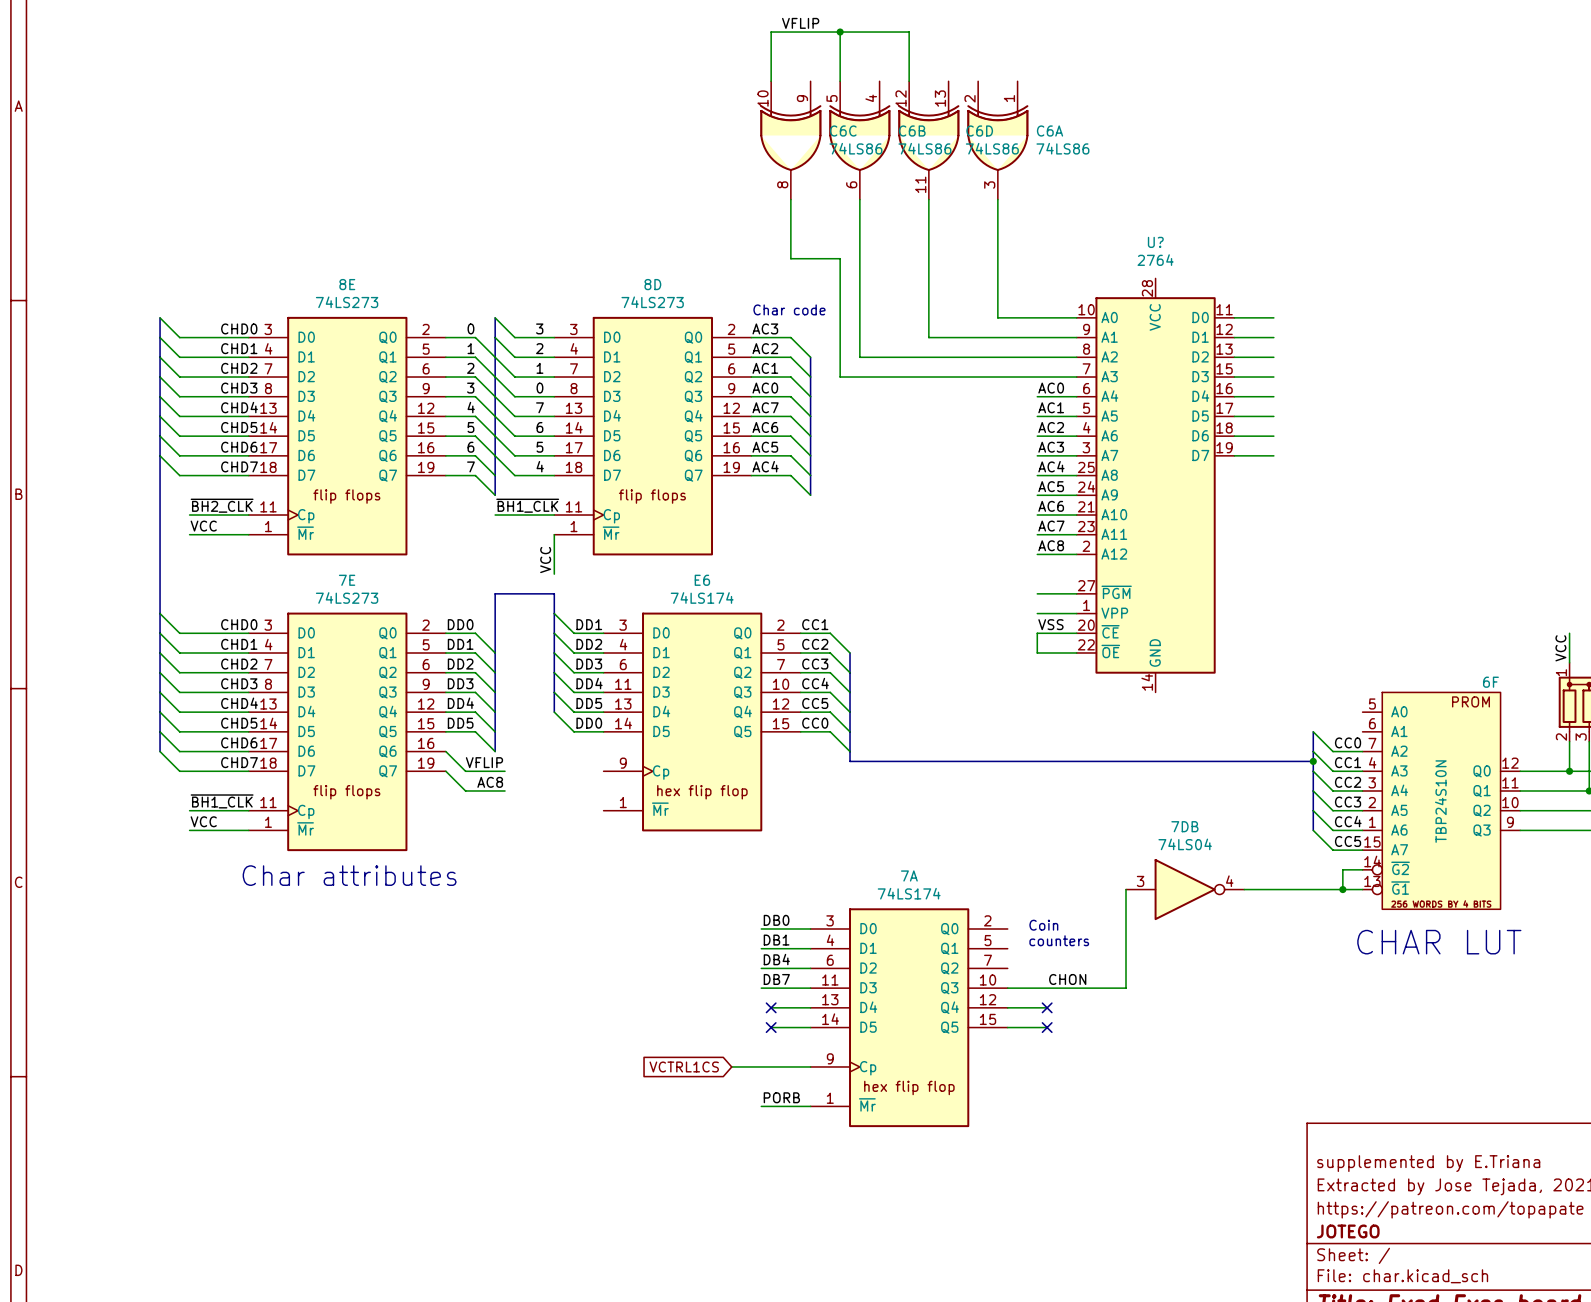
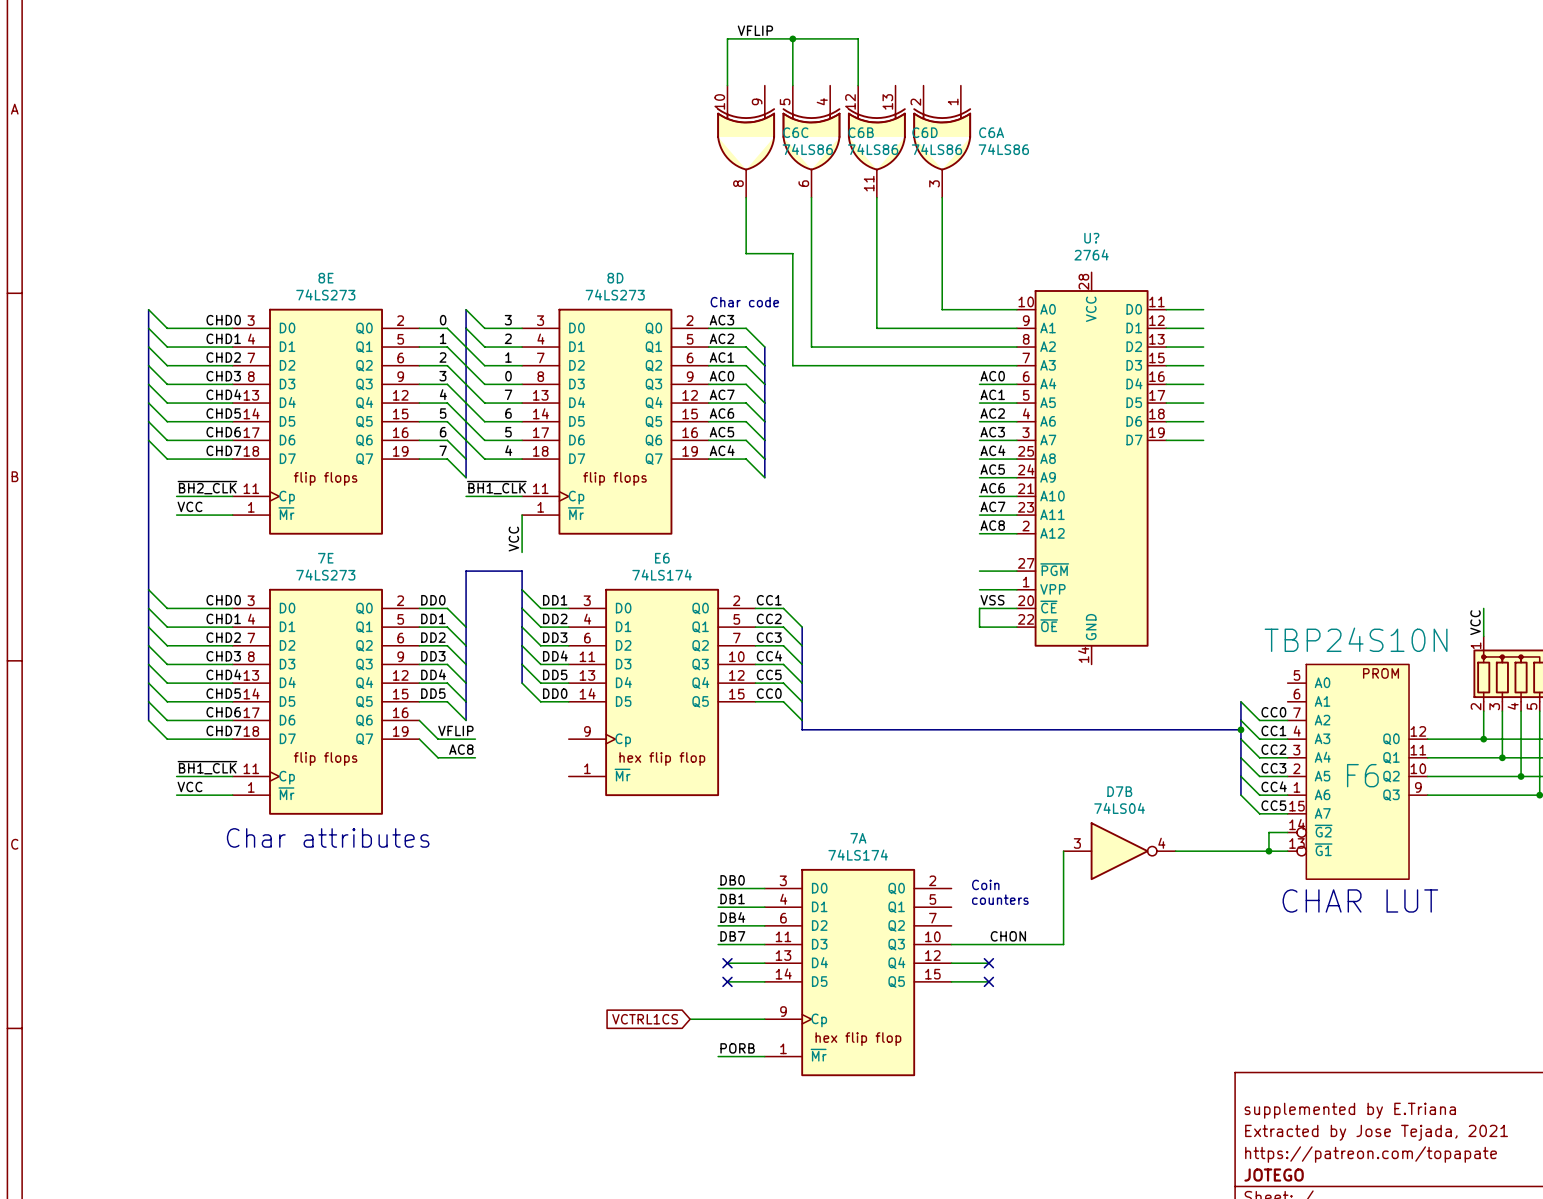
6F: TBP24S10N (1441, 800) -> none
F6: none -> TBP24S10N (1357, 771)
7DB name: 7DB (1184, 826) -> D7B (1119, 791)

